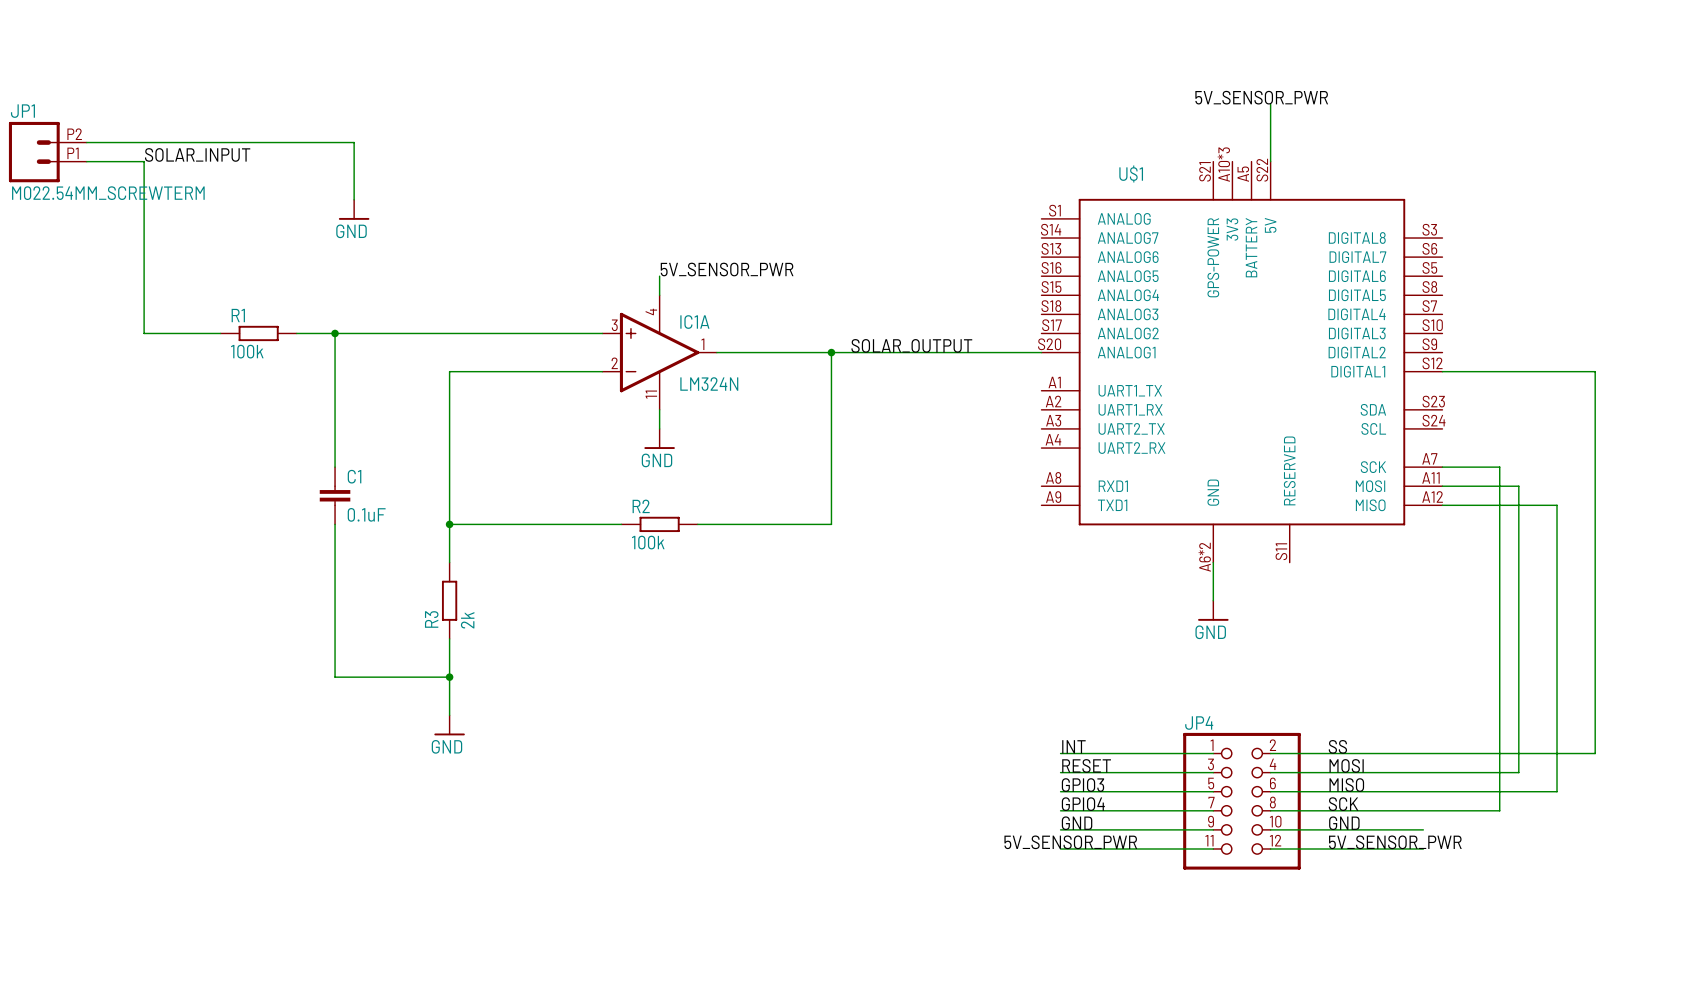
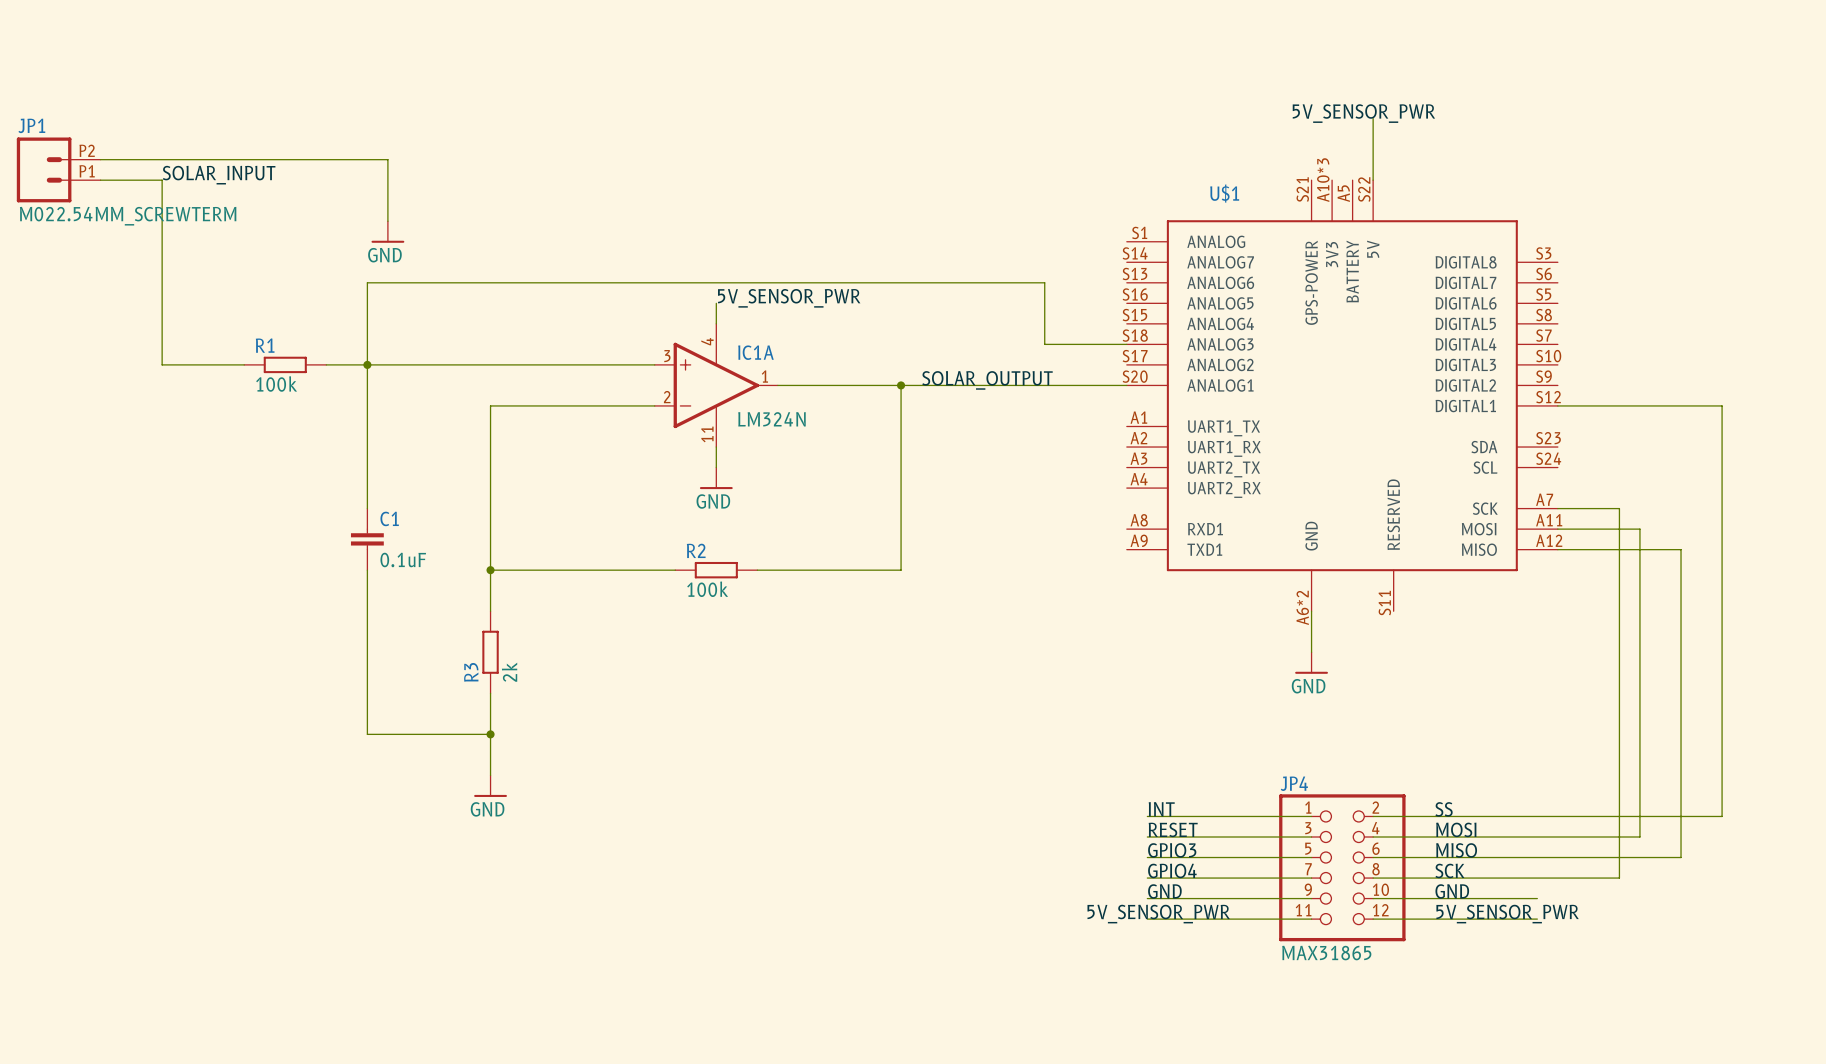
wire: none -> (1126, 344) (1044, 344) (1044, 282) (367, 282) (367, 364)
JP4 value: none -> MAX31865 (1326, 953)

